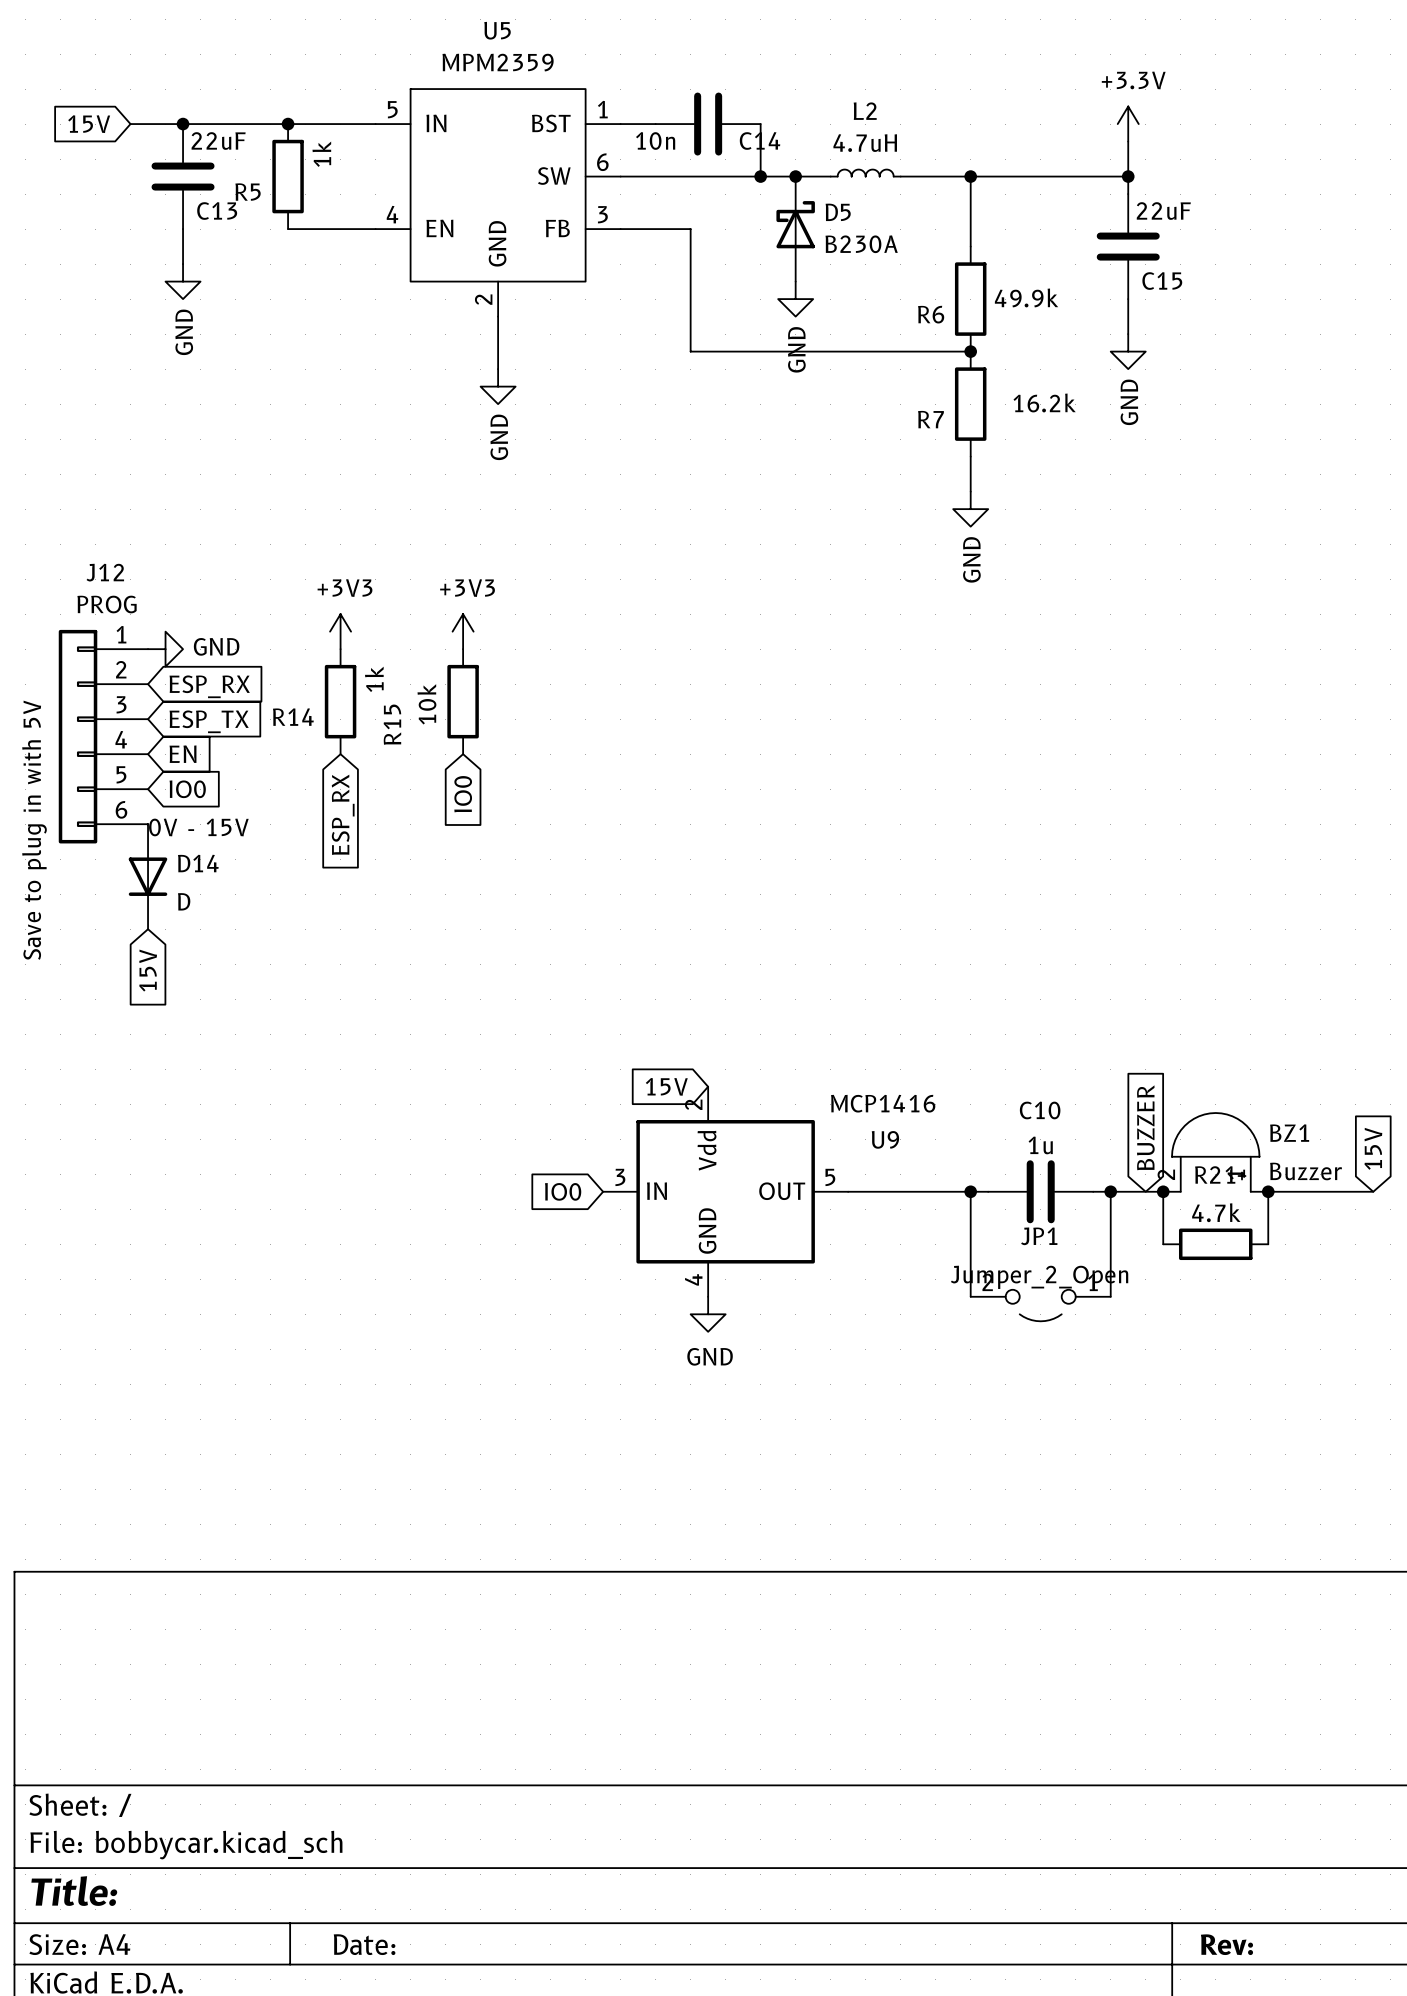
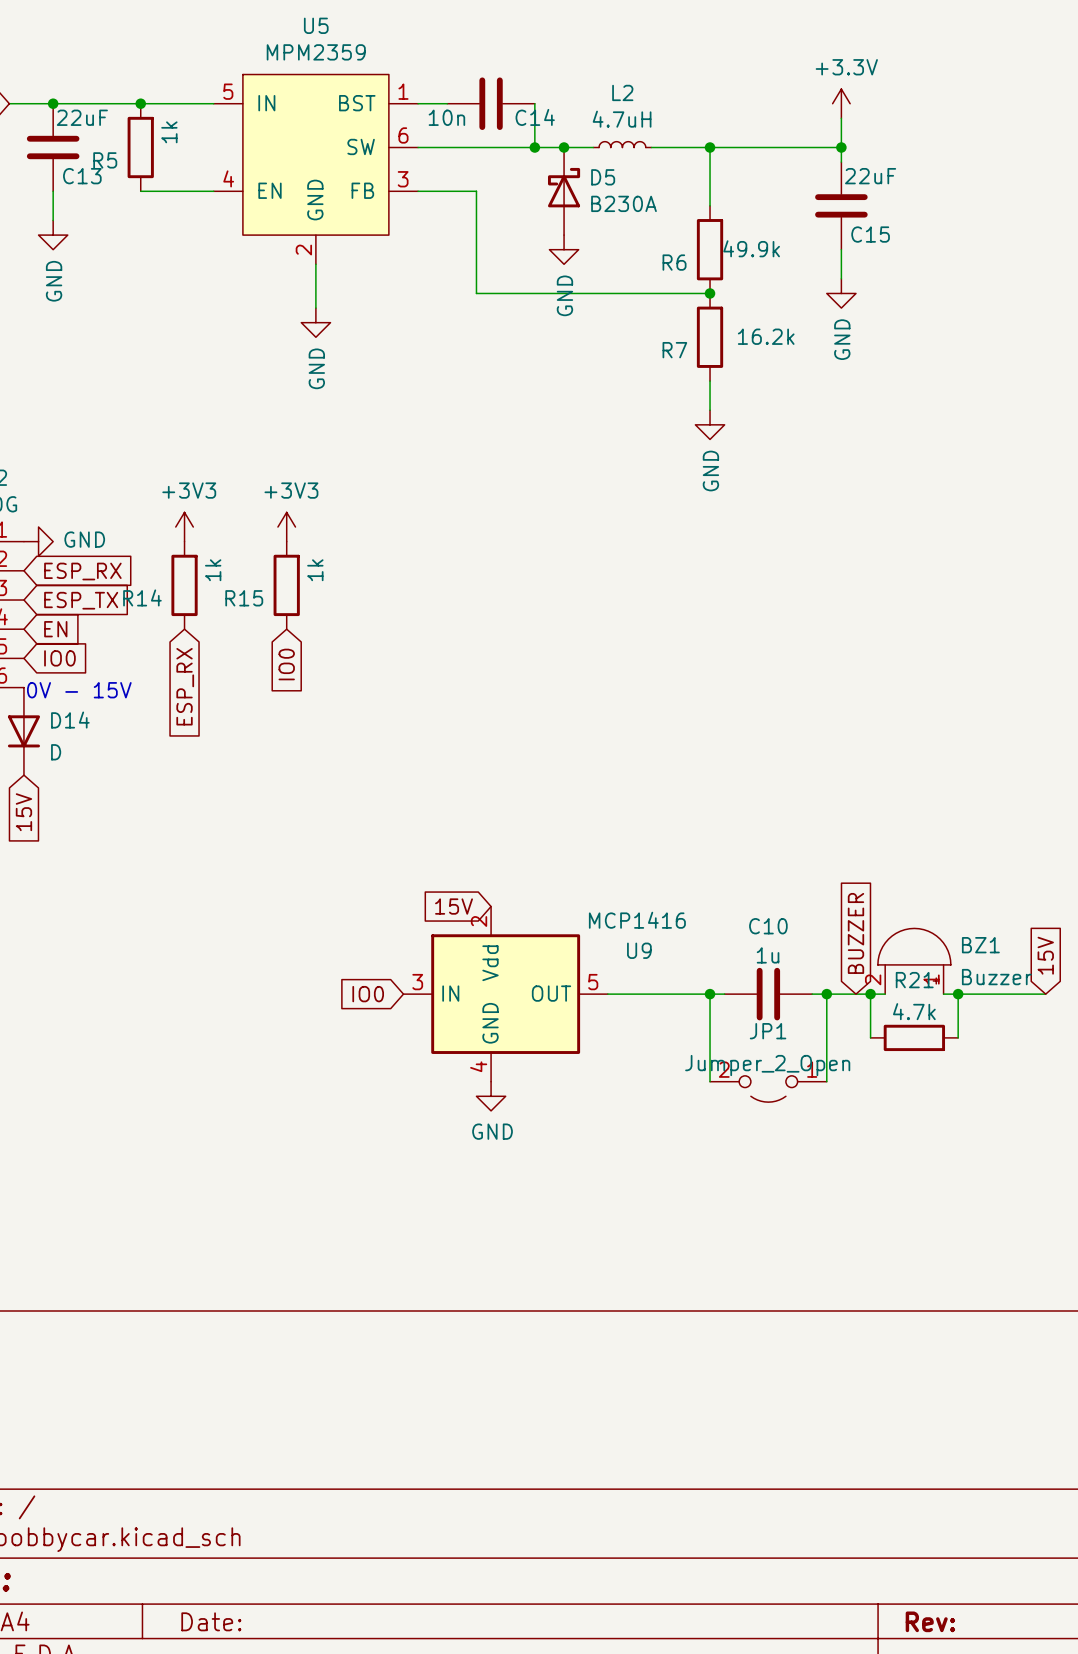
R15 value: 10k (426, 704) -> 1k (315, 570)
R15 name rotation: 0° (392, 724) -> 90° clockwise (244, 598)

